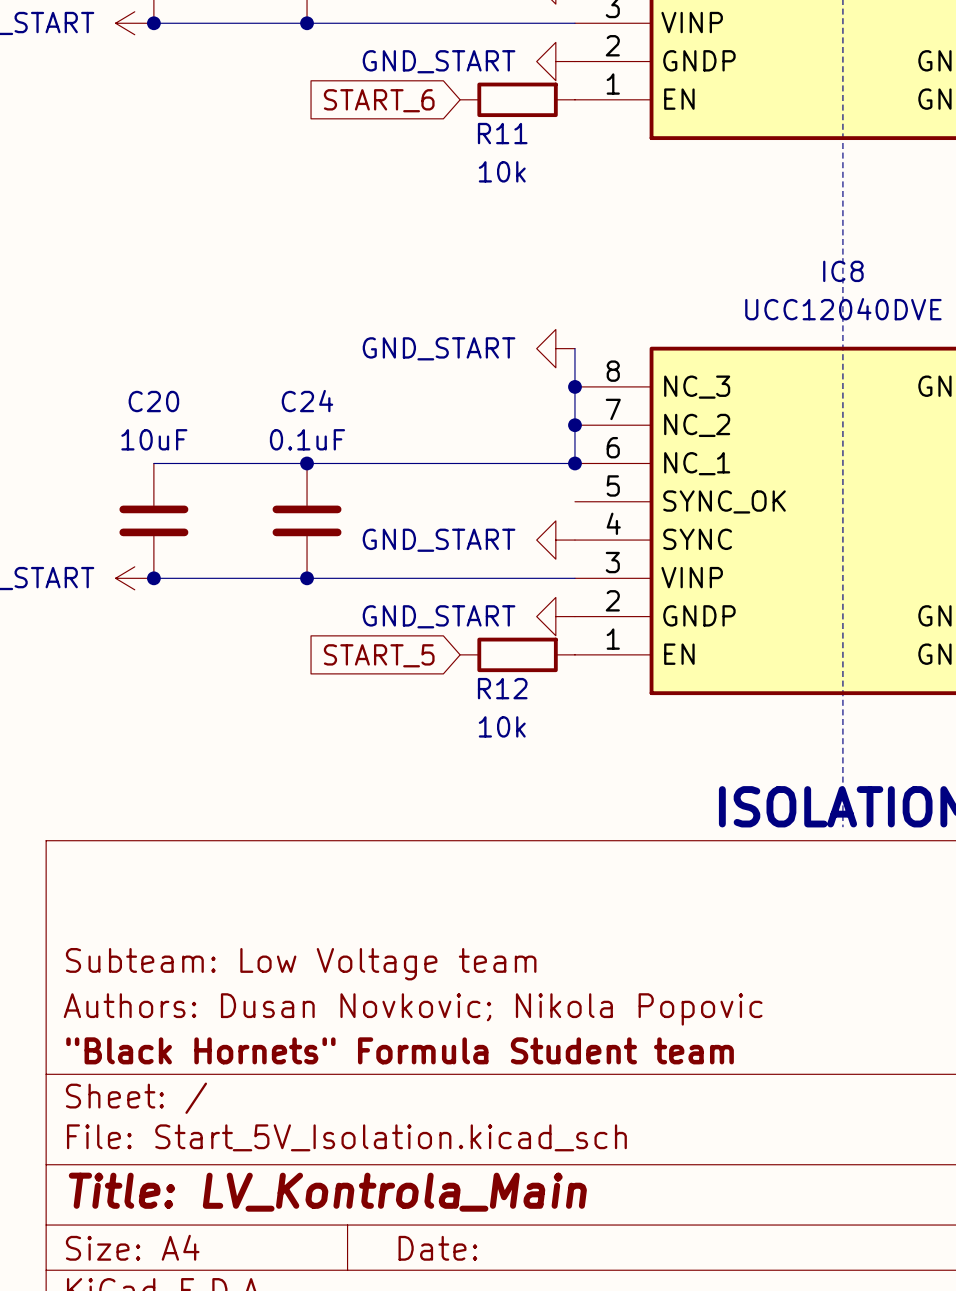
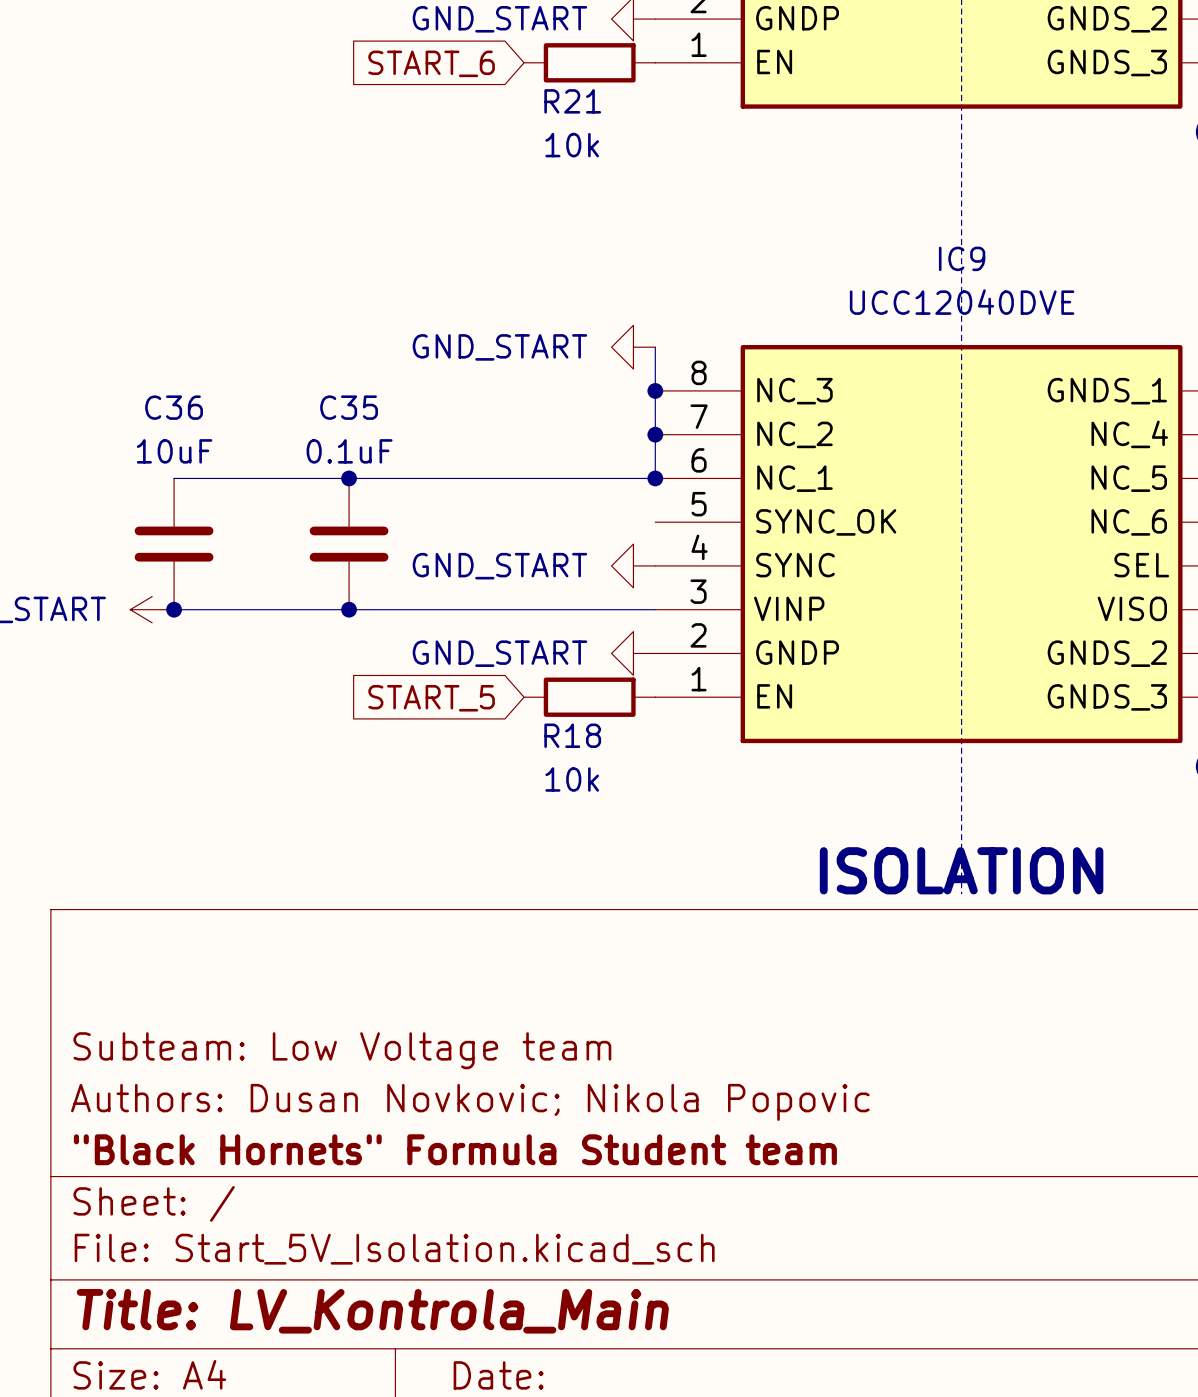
R11 name: R11 (502, 133) -> R21 (572, 101)
IC8 name: IC8 (843, 271) -> IC9 (962, 258)
C20 name: C20 (153, 401) -> C36 (174, 407)
C24 name: C24 (307, 401) -> C35 (349, 407)
R12 name: R12 (502, 688) -> R18 (572, 735)

